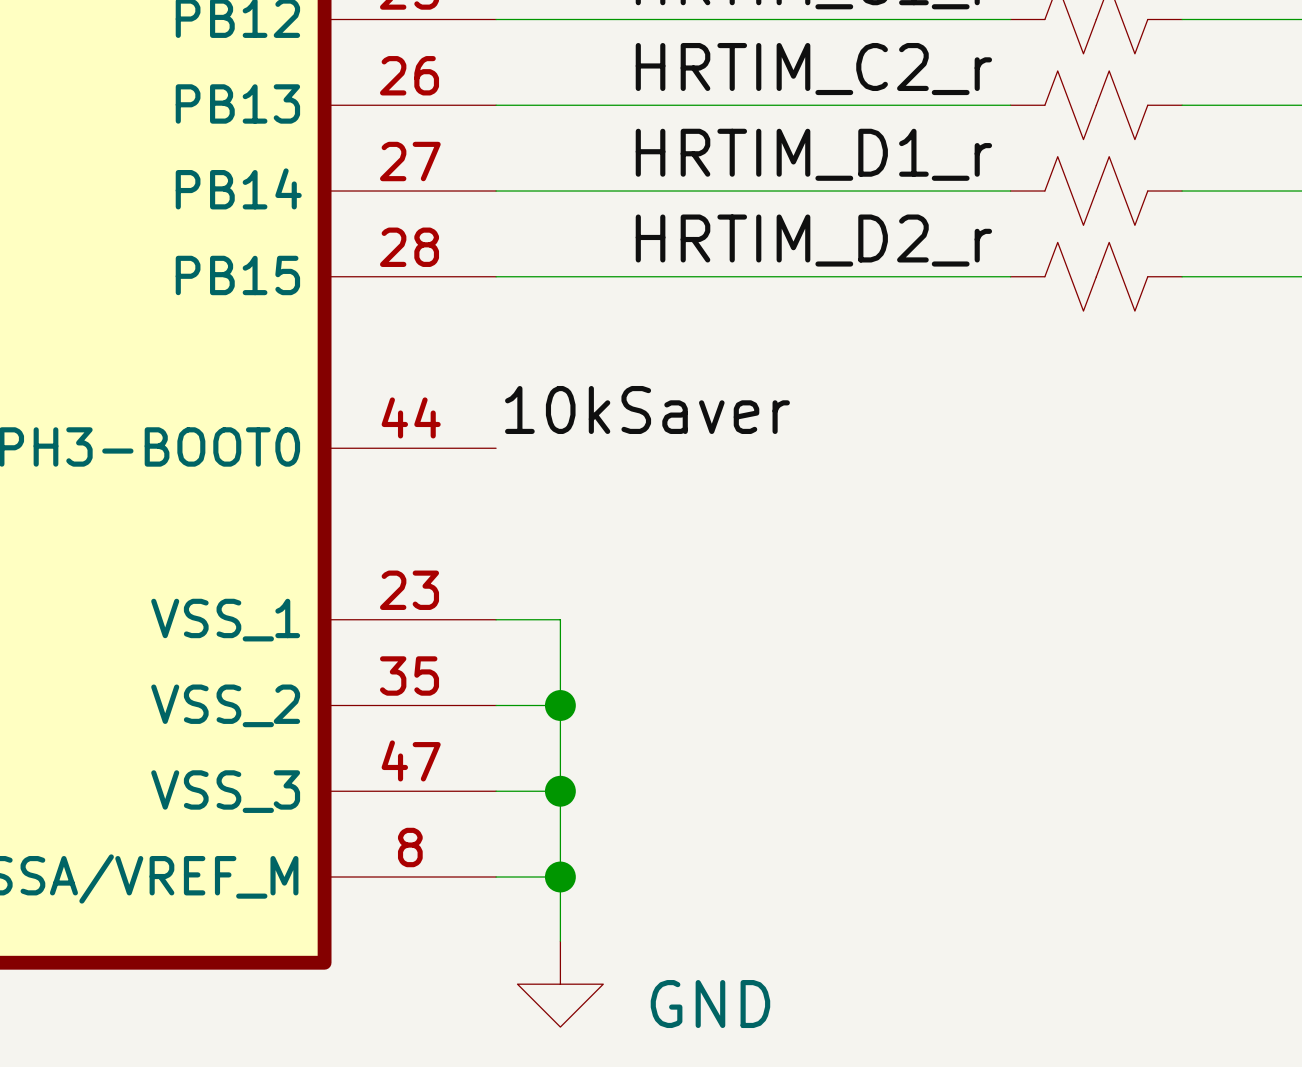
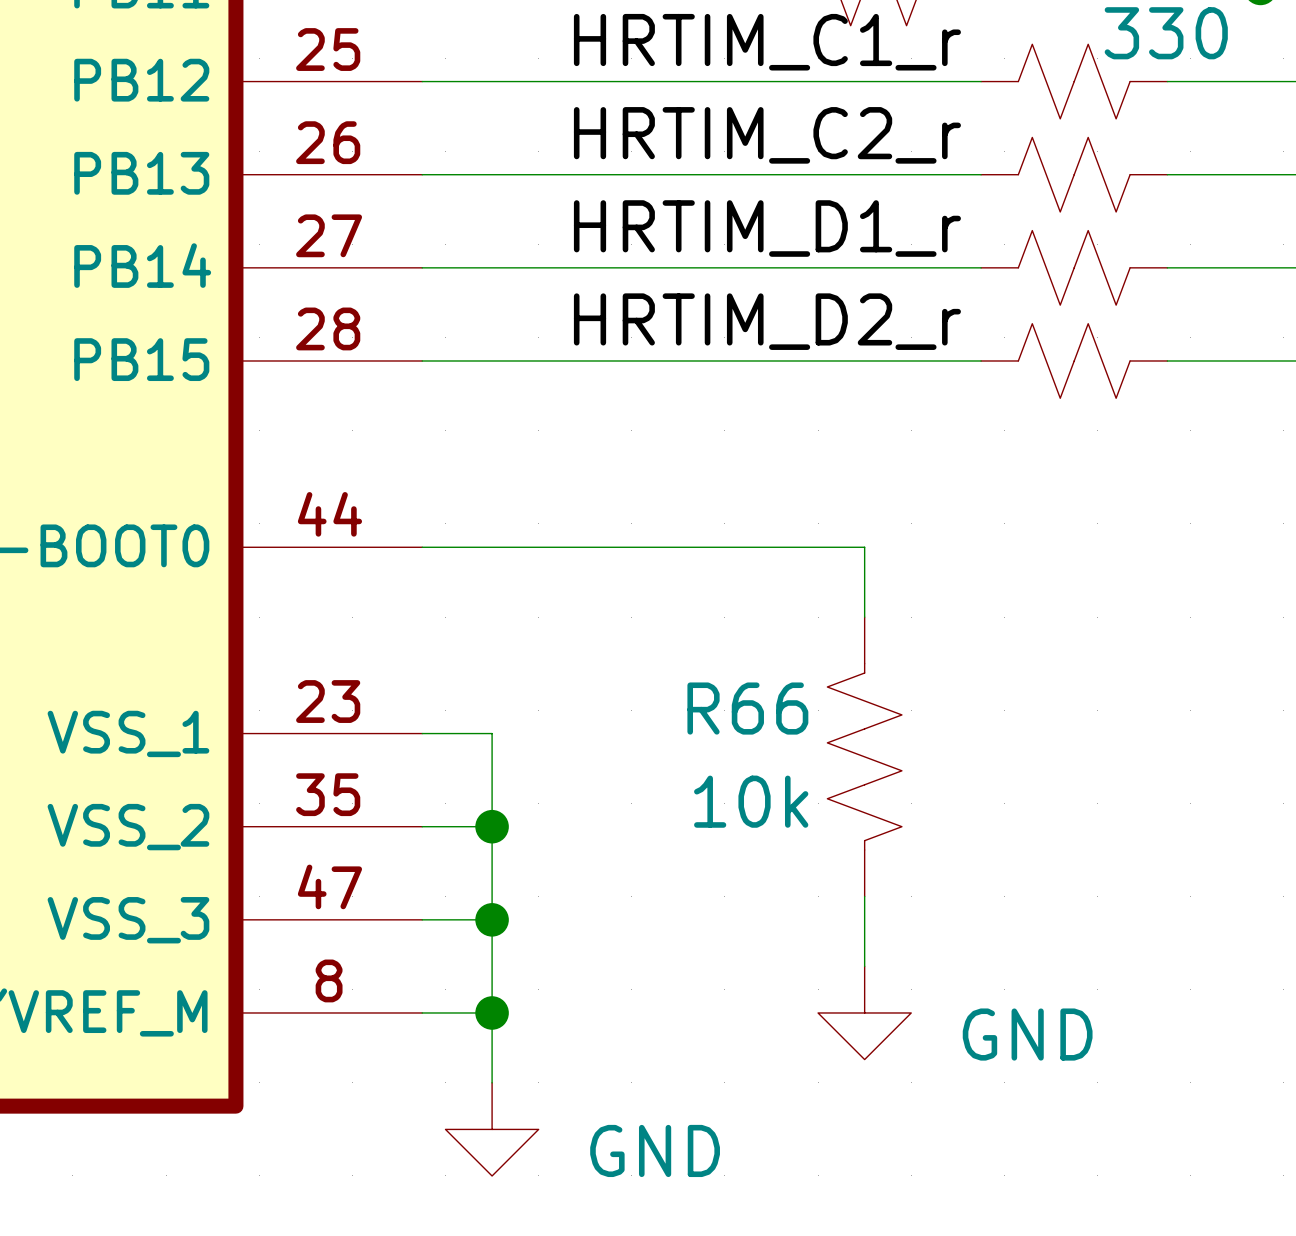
label: 10kSaver (647, 409) -> none
wire: none -> (422, 547) (864, 547) (864, 617)
R66: none -> 10k (864, 756)
wire: none -> (864, 896) (864, 966)
power symbol: none -> GND (864, 1012)

